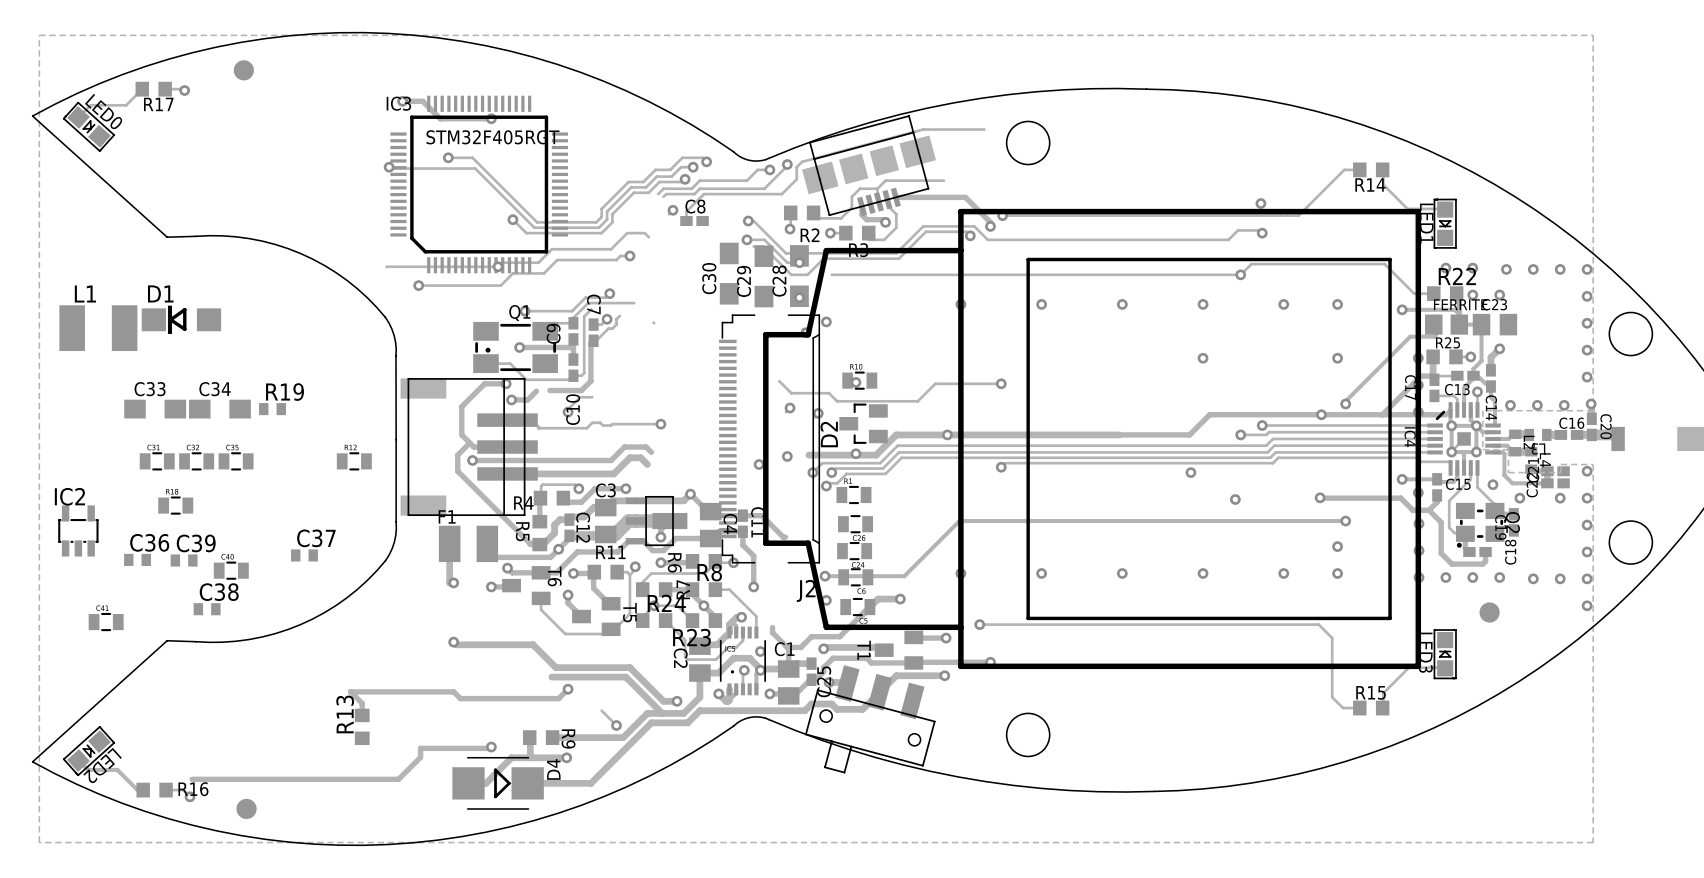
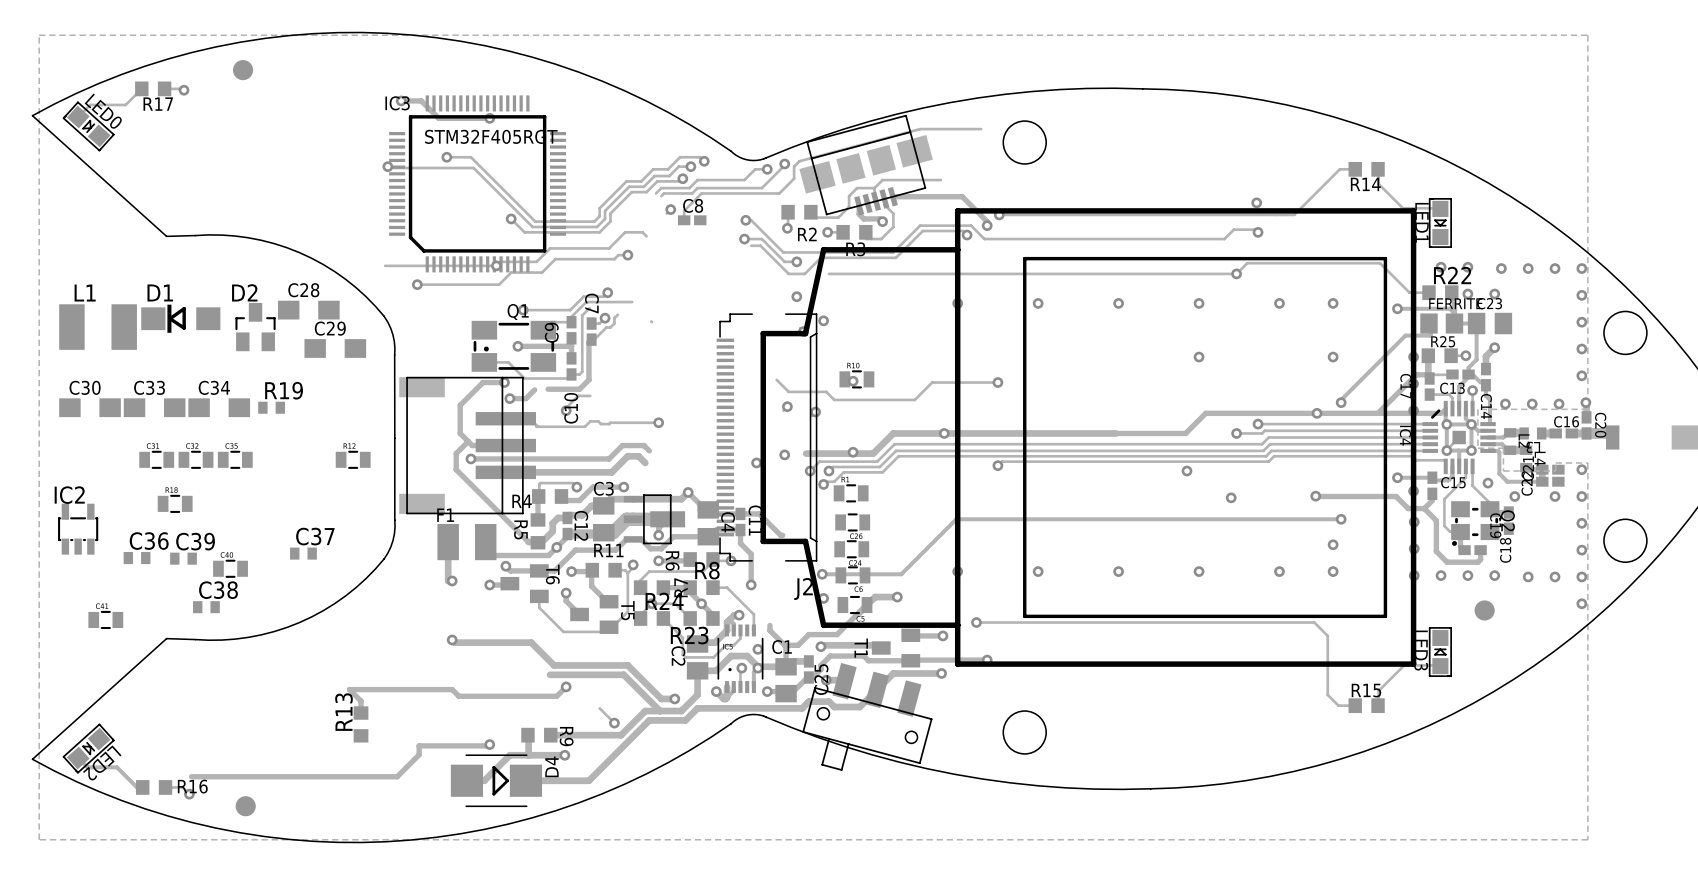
C30 rotation: 0° (729, 273) -> 90° clockwise (90, 407)
C30 position: (729, 273) -> (90, 407)
C29 rotation: 0° (763, 276) -> 90° clockwise (335, 348)
C29 position: (763, 276) -> (335, 348)
C28 rotation: 0° (799, 276) -> 90° clockwise (308, 310)
C28 position: (799, 276) -> (308, 310)
D2 rotation: 0° (863, 423) -> 90° clockwise (255, 327)
D2 position: (863, 423) -> (255, 327)

